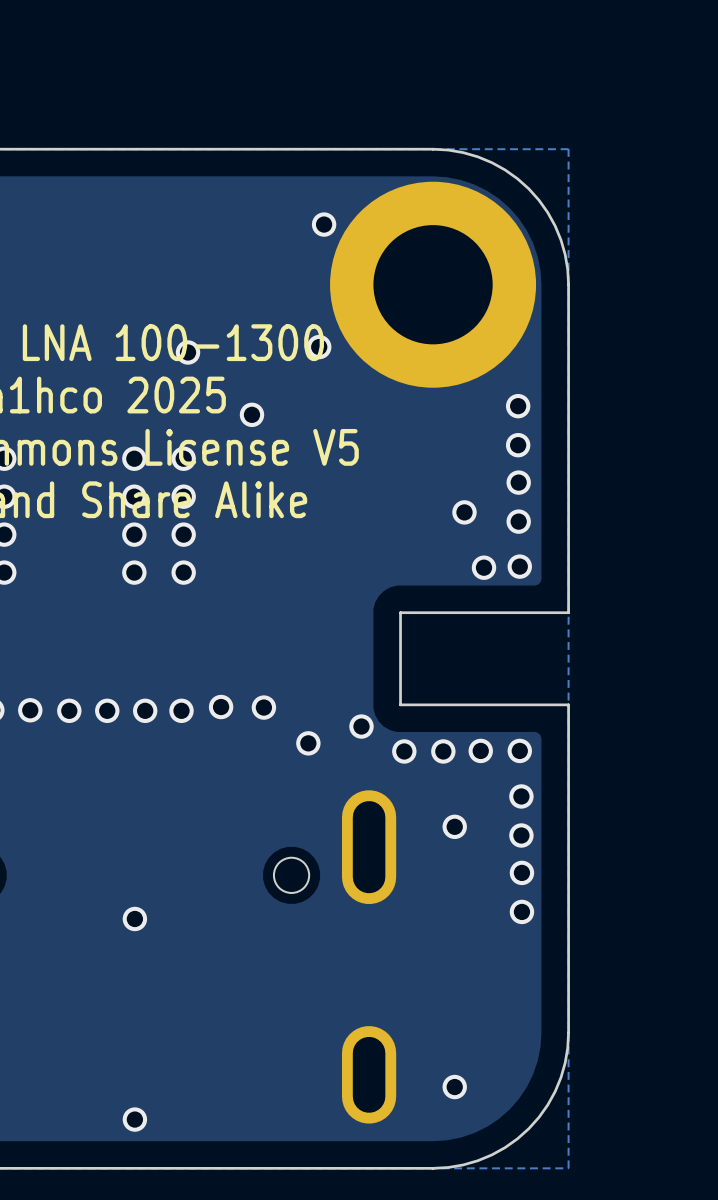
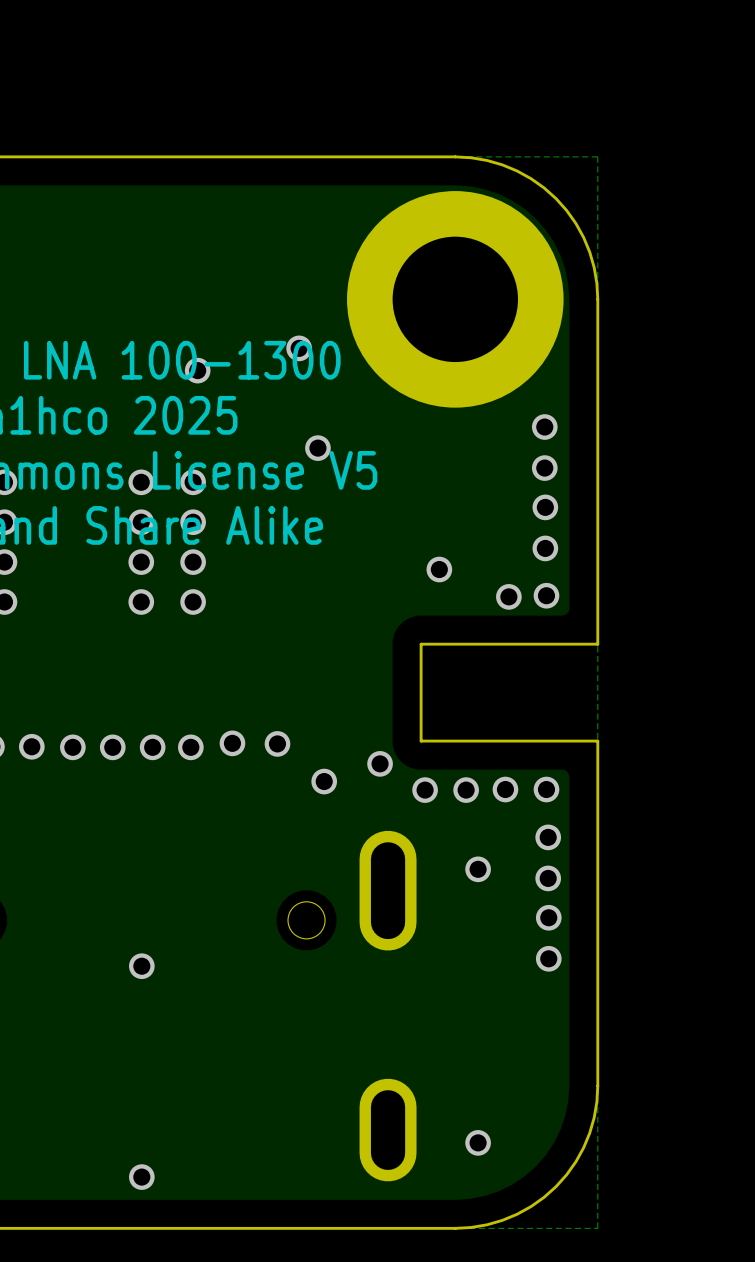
via: (324, 224) -> none
via position: (319, 347) -> (299, 348)
via: (251, 414) -> none
via: none -> (317, 448)
via position: (464, 512) -> (439, 569)

